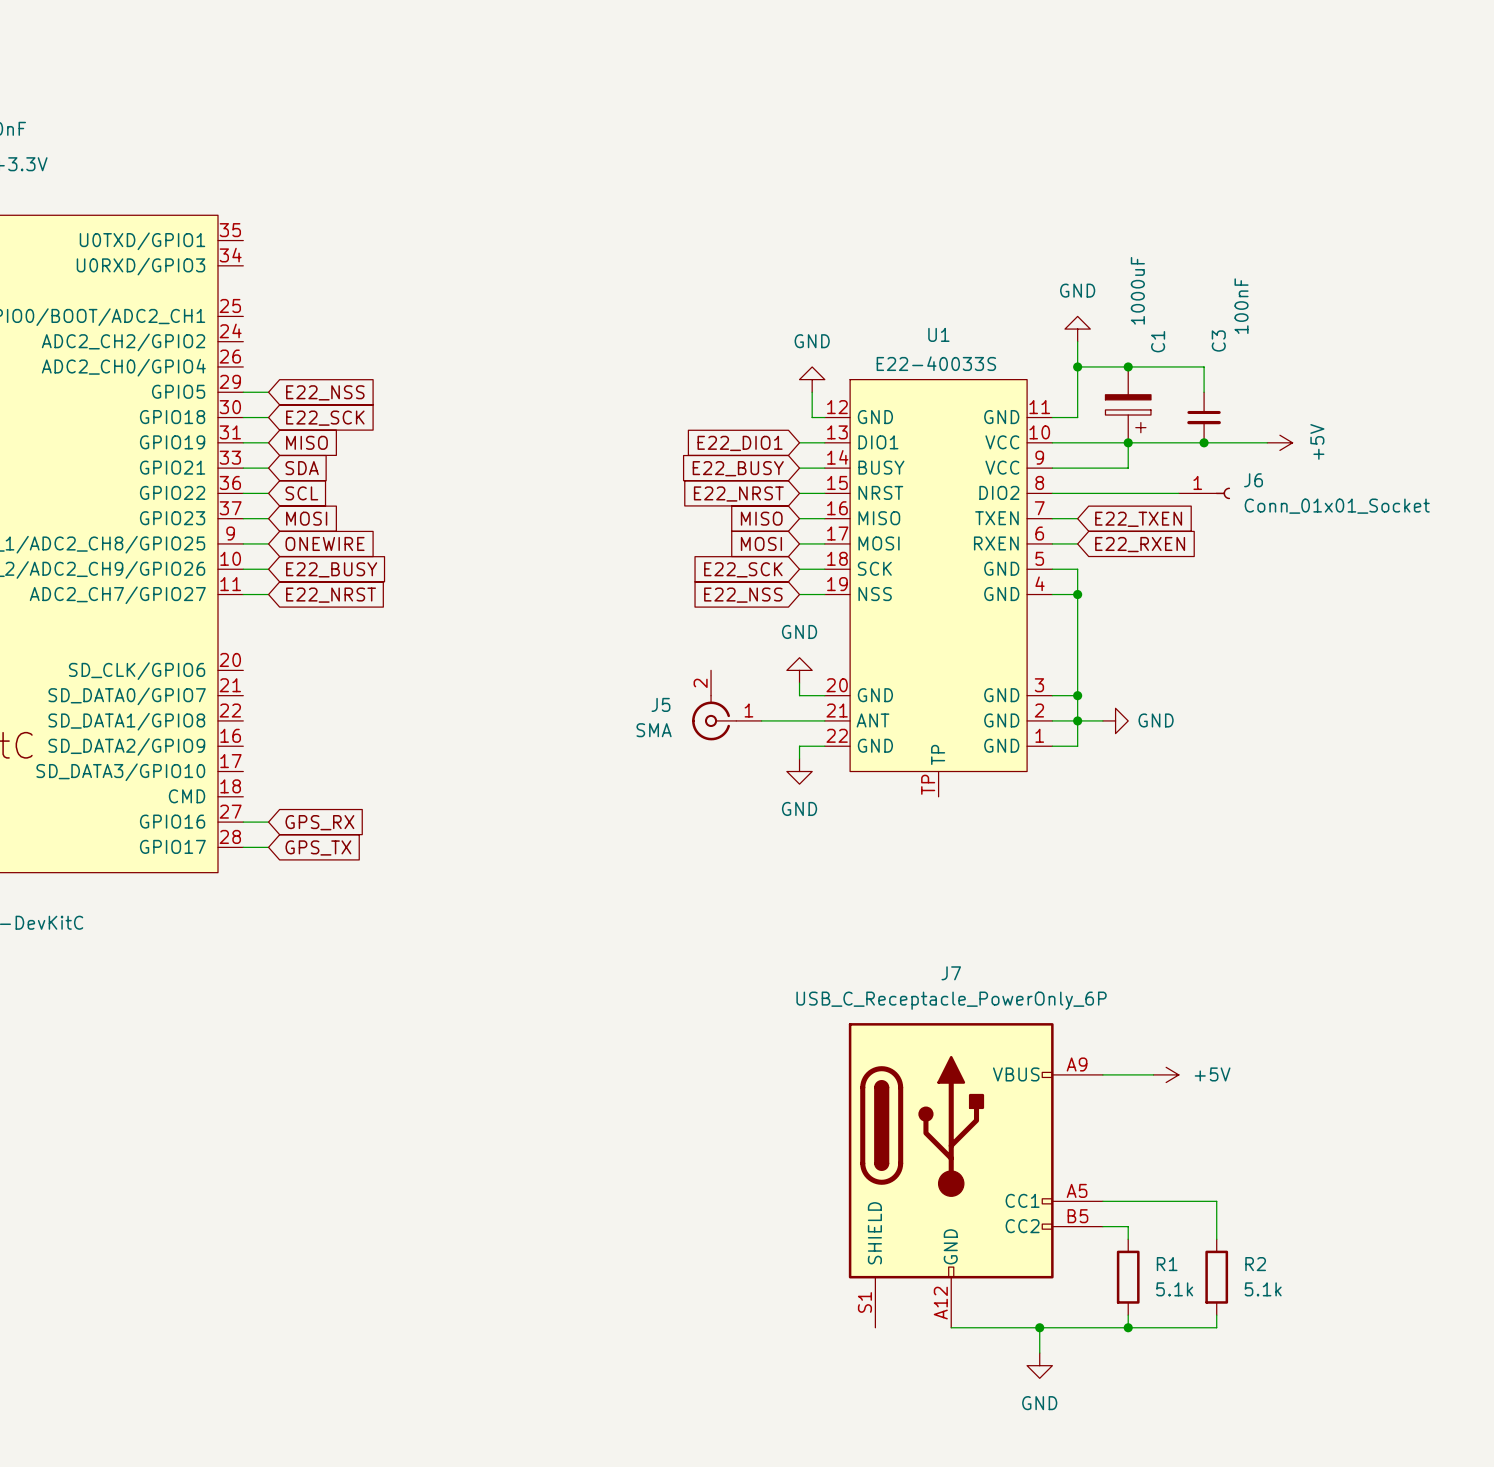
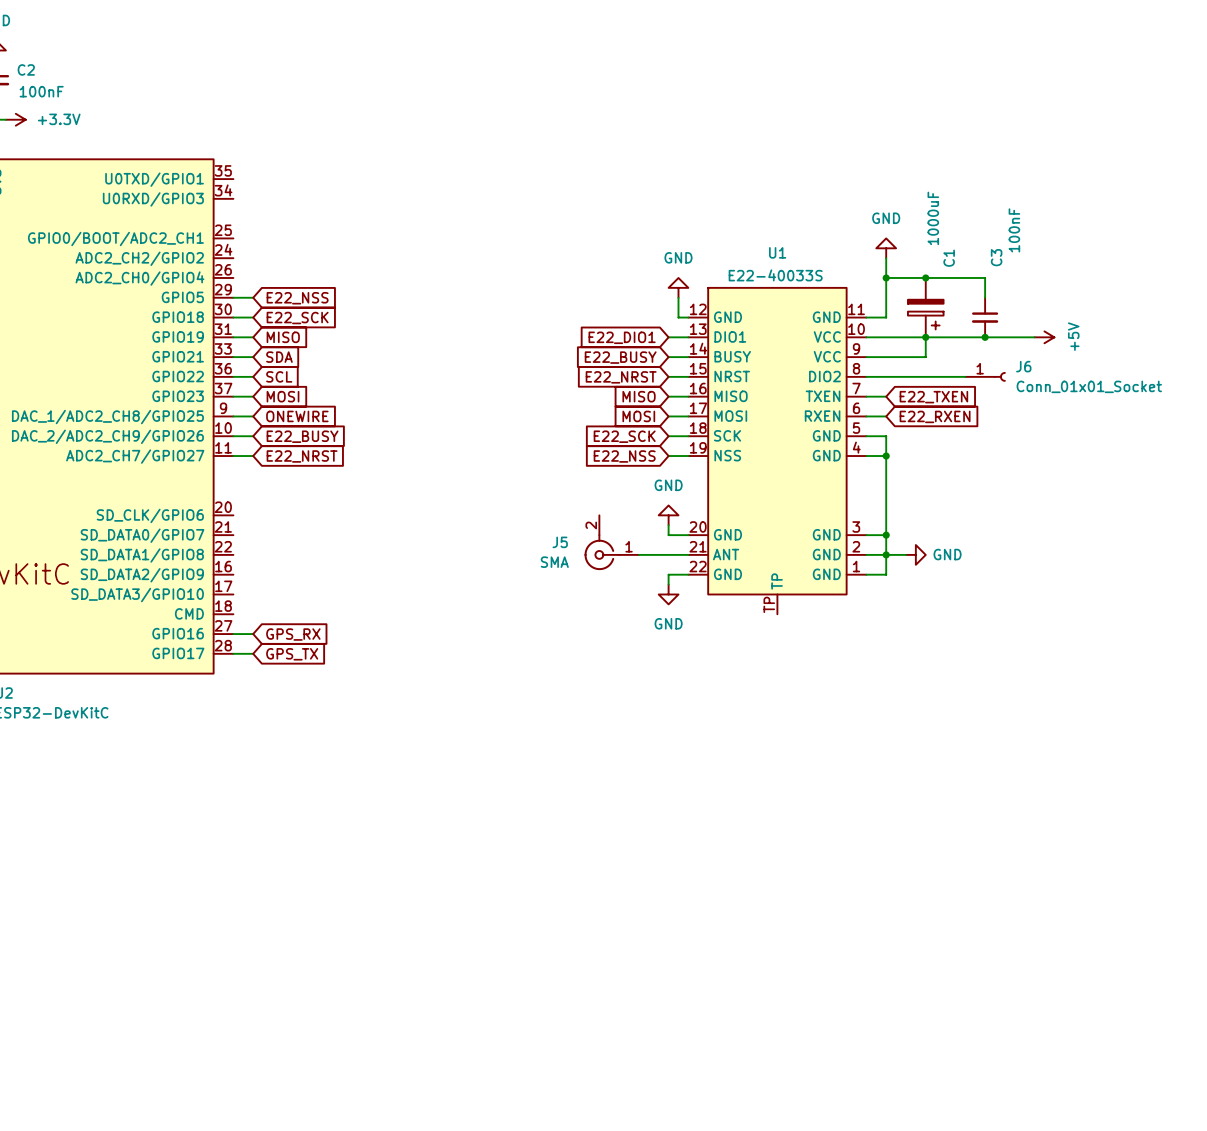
wire: (1102, 1074) (1153, 1074) -> none
power symbol: +5V (1166, 1074) -> none
J7: USB_C_Receptacle_PowerOnly_6P (975, 1175) -> none
wire: (1102, 1201) (1216, 1201) (1216, 1239) -> none
wire: (1102, 1226) (1128, 1226) (1128, 1239) -> none
R1: 5.1k (1128, 1277) -> none
R2: 5.1k (1216, 1277) -> none
wire: (1128, 1315) (1128, 1327) -> none
wire: (1216, 1315) (1216, 1327) (951, 1327) -> none
wire: (1039, 1327) (1039, 1353) -> none
junction: (1039, 1327) -> none
junction: (1128, 1327) -> none
power symbol: GND (1039, 1365) -> none

